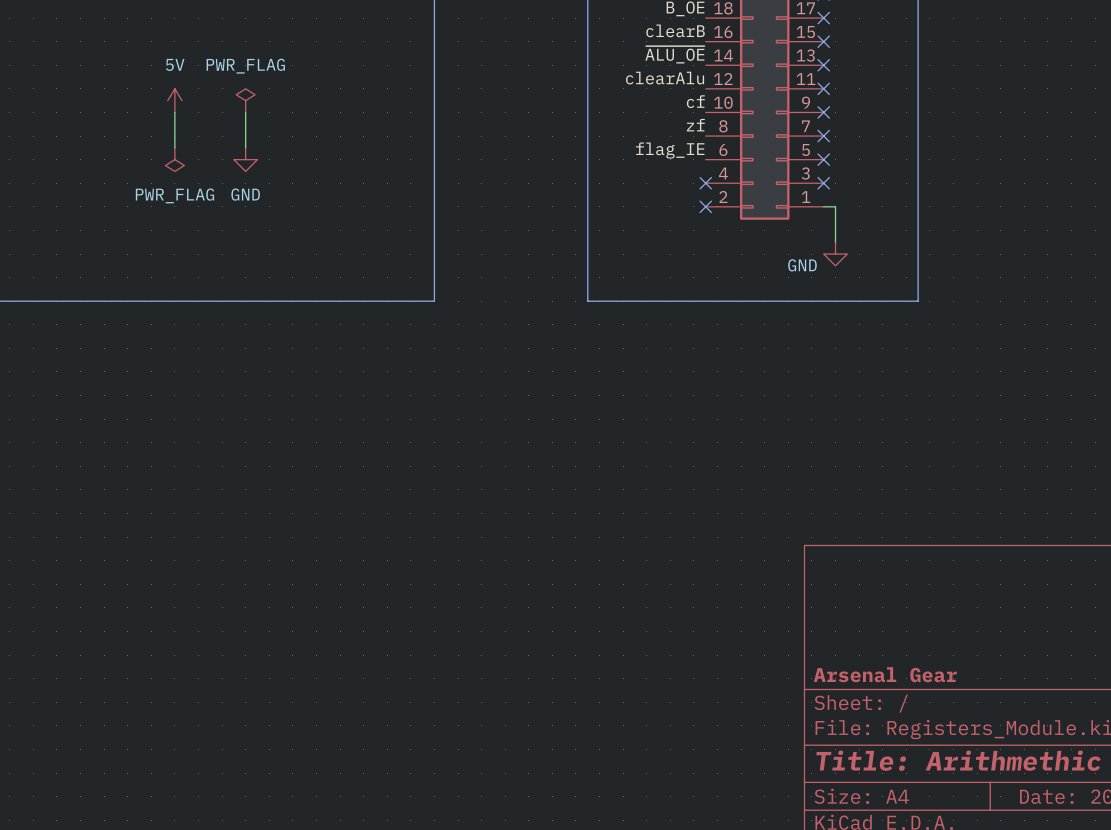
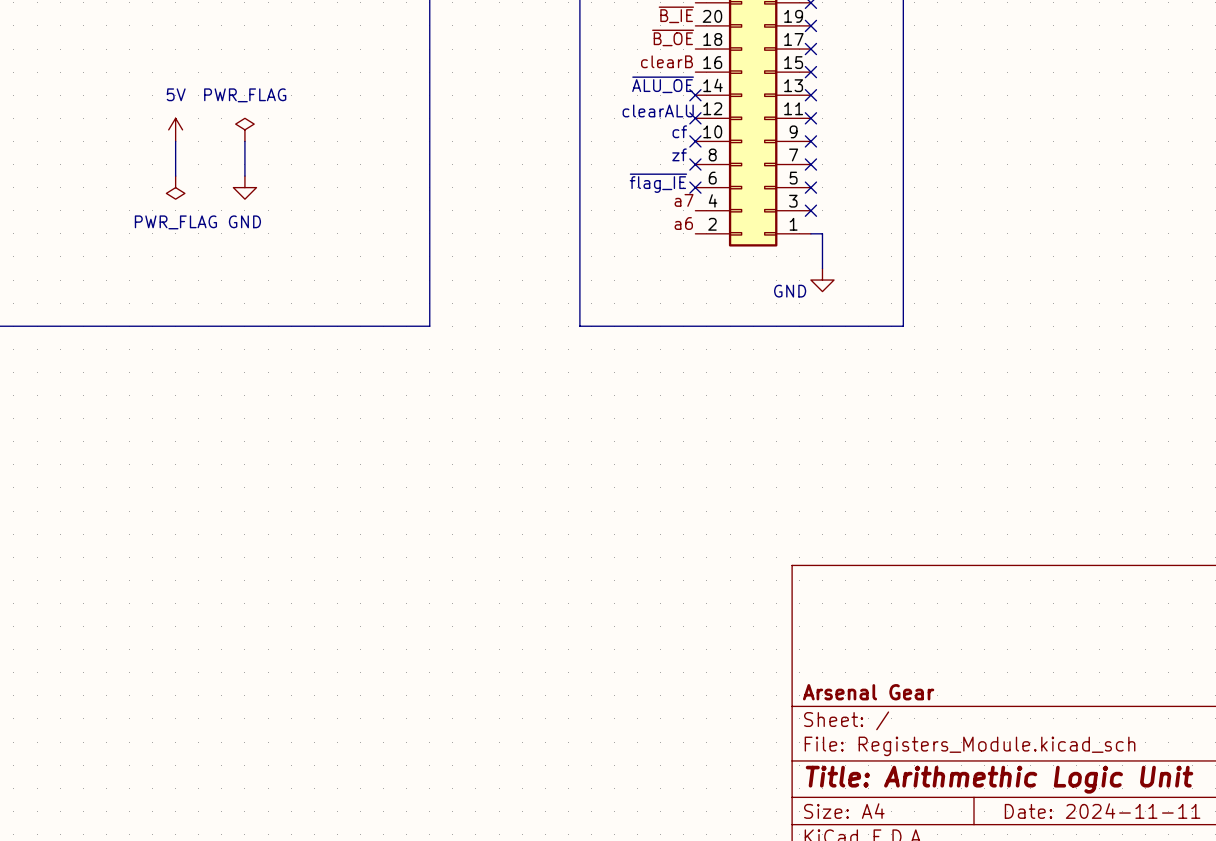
label: ~{ALU_OE} (674, 54) -> none
text: none -> ~{ALU_OE} (663, 84)
no-connect mark: none -> (695, 95)
label: clearAlu (665, 78) -> none
text: none -> clearALU (658, 110)
no-connect mark: none -> (695, 118)
label: cf (695, 101) -> none
text: none -> cf (679, 131)
no-connect mark: none -> (695, 141)
text: none -> zf (679, 154)
label: zf (695, 125) -> none
no-connect mark: none -> (695, 164)
label: flag_IE (670, 150) -> none
text: none -> ~{flag_IE} (658, 183)
no-connect mark: none -> (695, 187)
label: none -> a7 (684, 200)
no-connect mark: (705, 183) -> none
label: none -> a6 (683, 223)
no-connect mark: (705, 206) -> none

